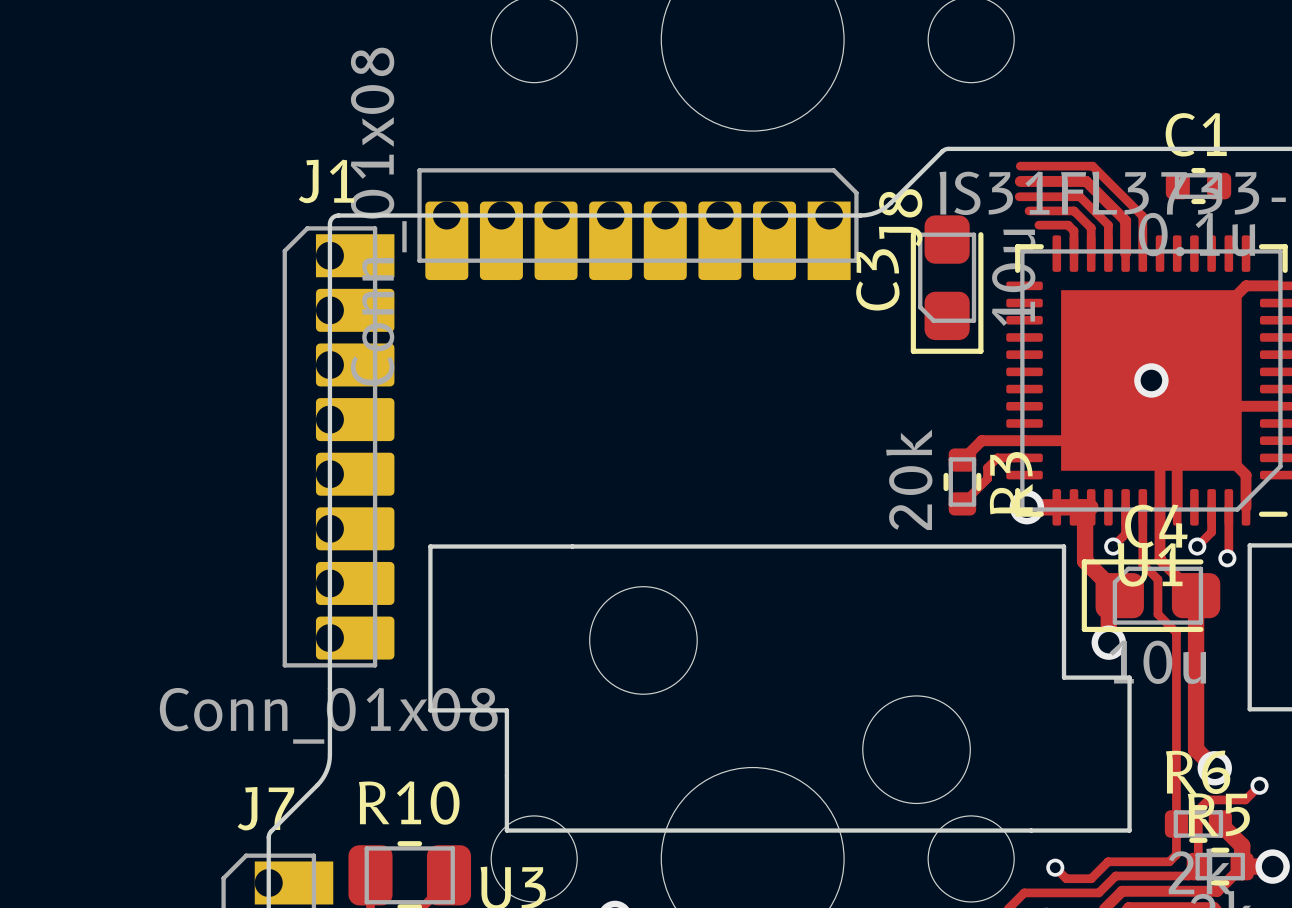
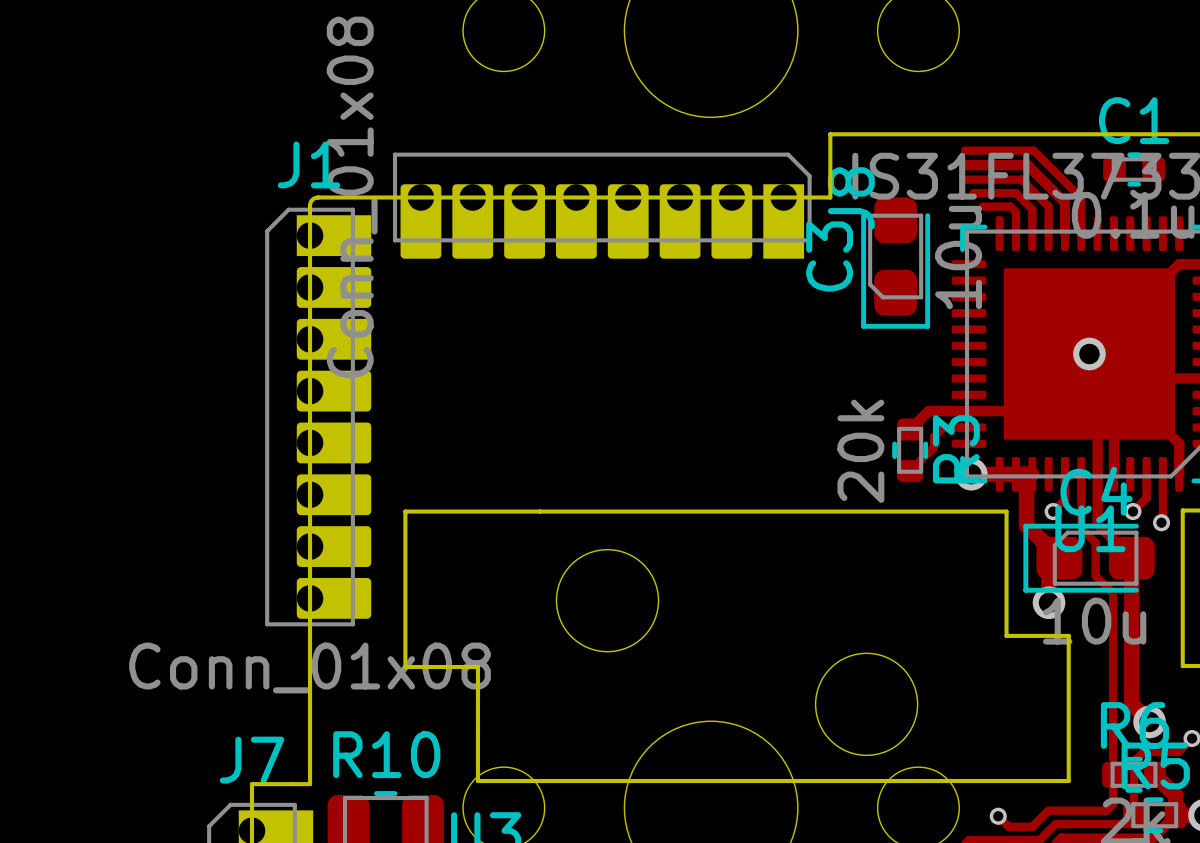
board edge: (948, 148) (942, 151) (886, 206) (876, 212) (860, 215) -> (896, 134) (830, 134) (830, 197) (813, 197)
board edge: (329, 754) (328, 767) (322, 778) (271, 831) (268, 837) -> (310, 709) (310, 784) (251, 784) (251, 787)

